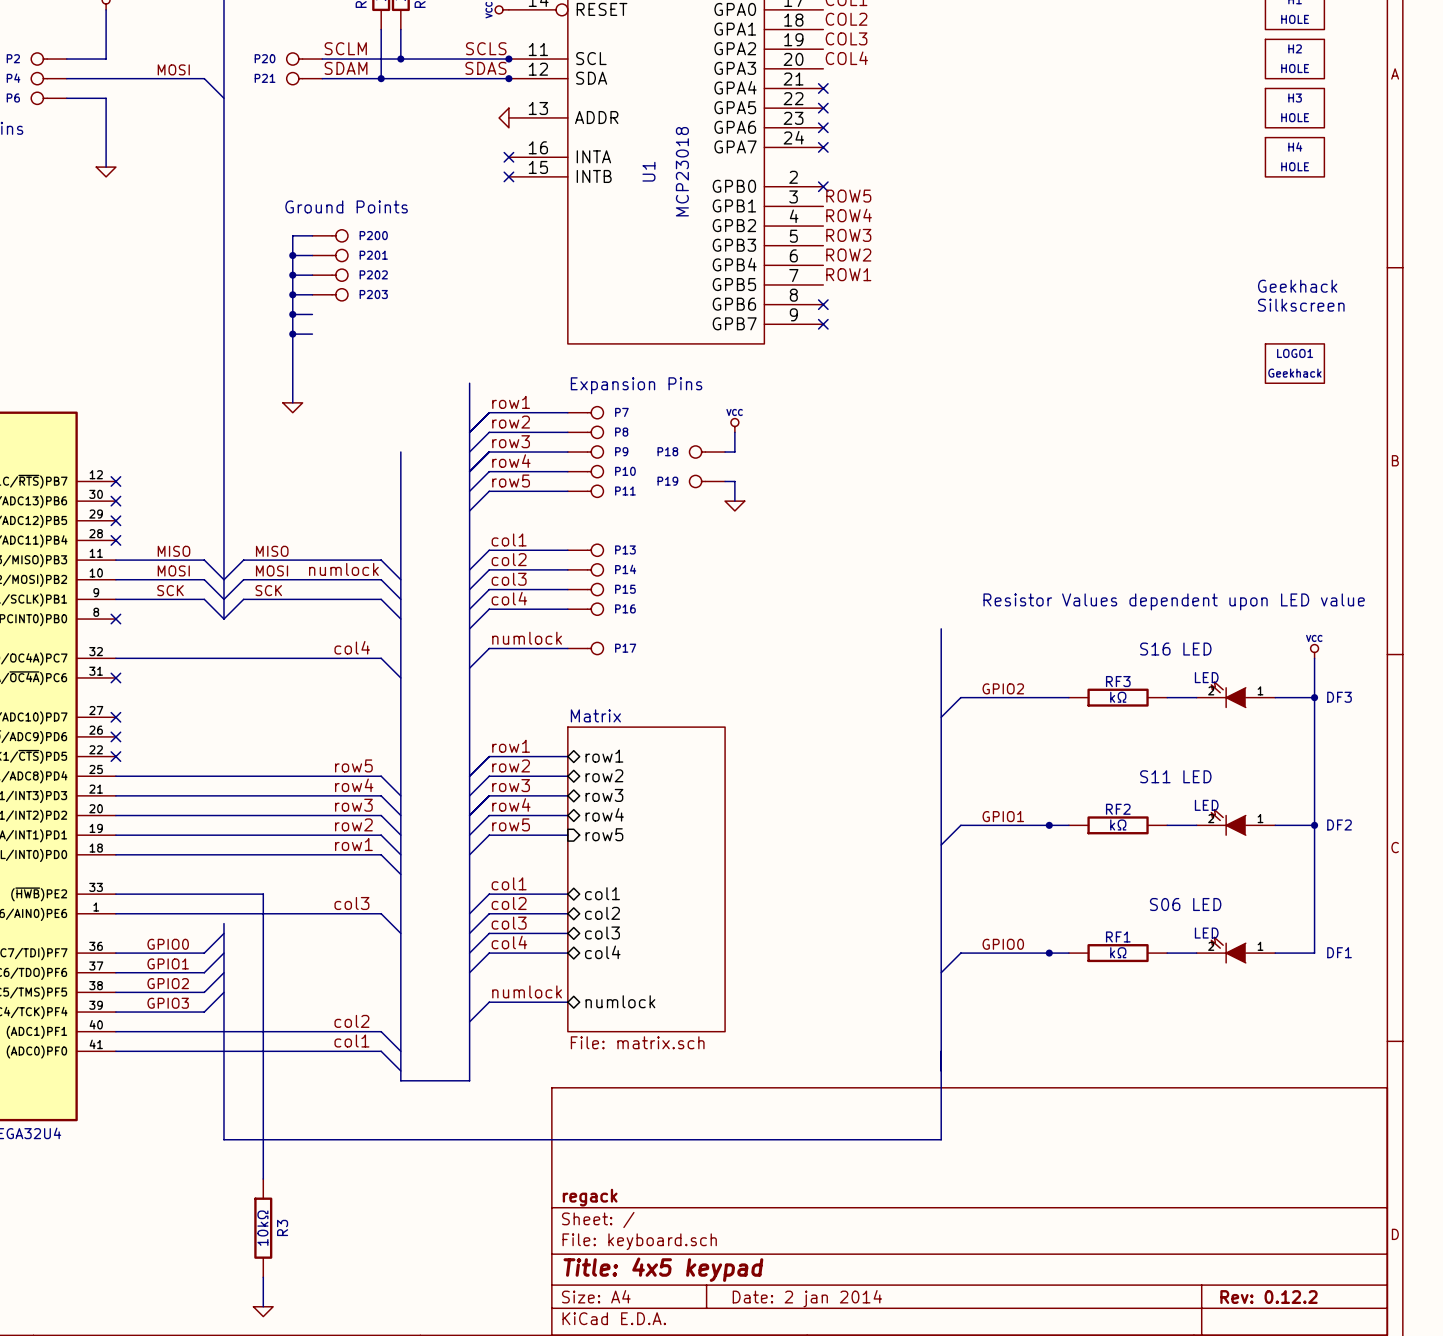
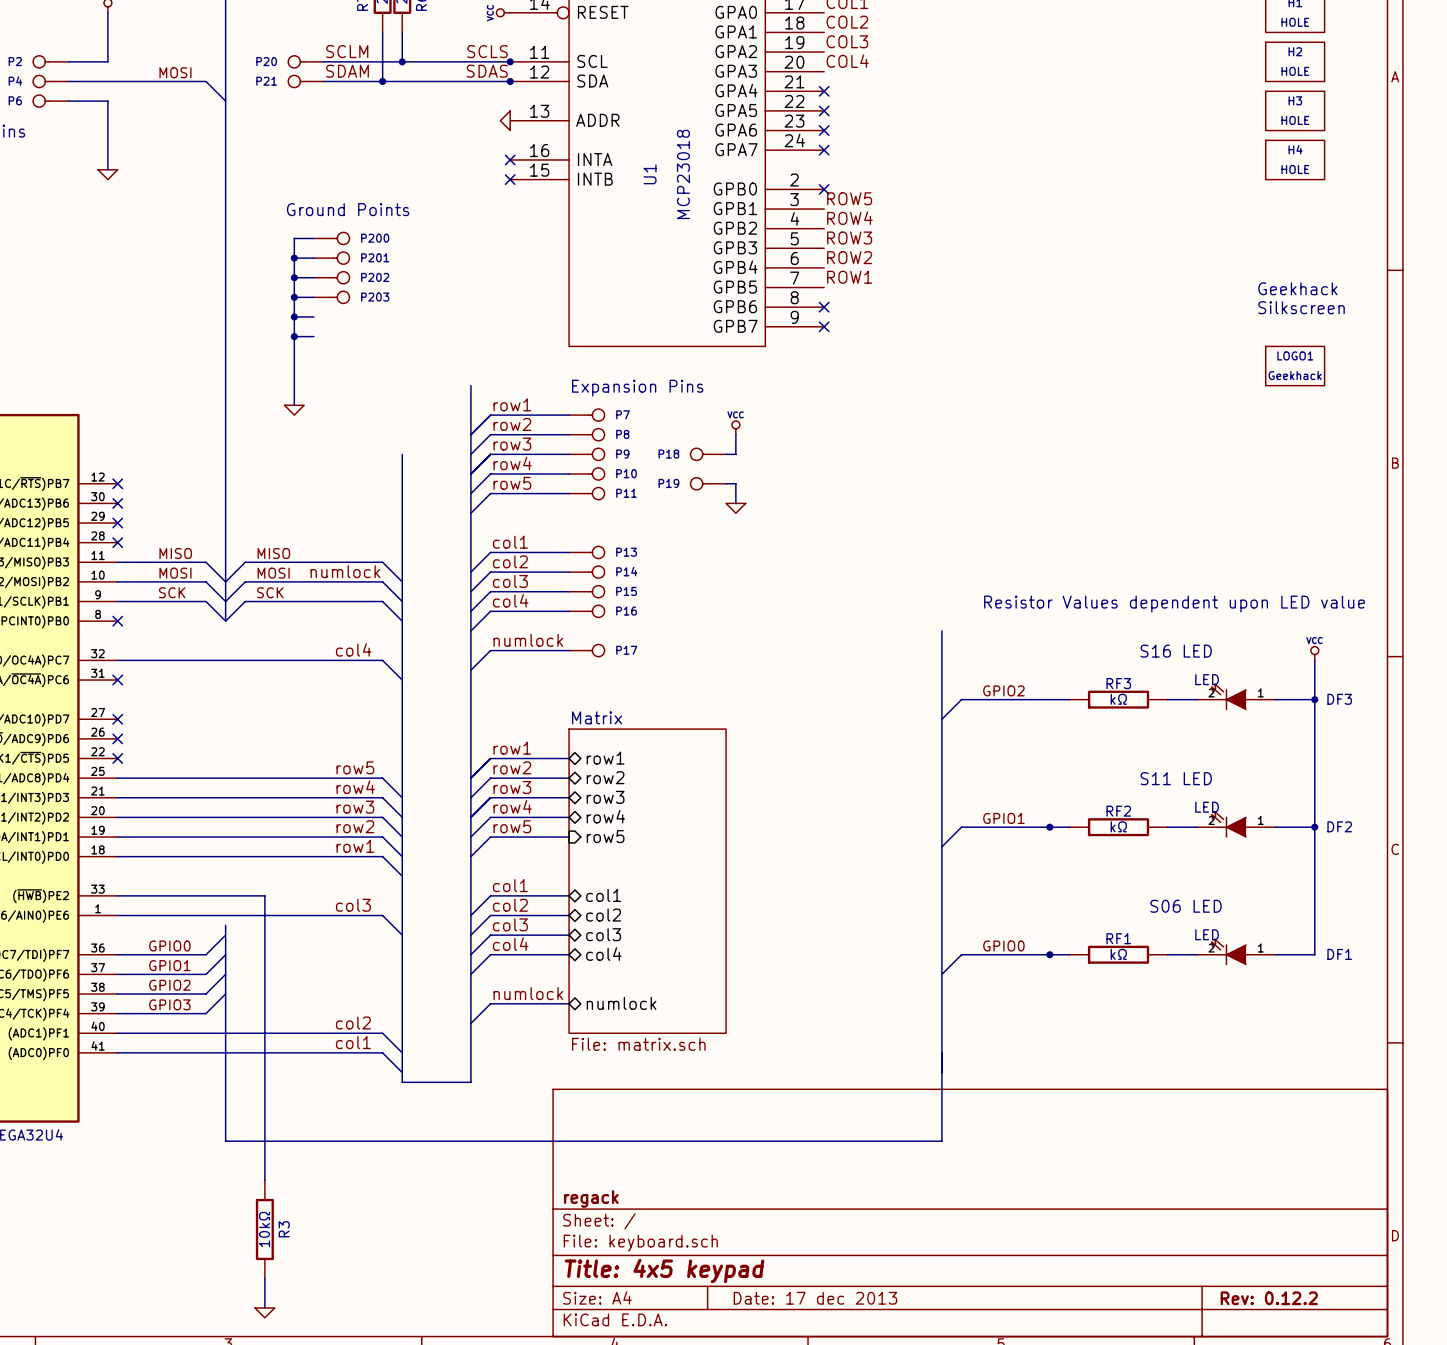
title block: Date: 2 jan 2014 (807, 1298) -> Date: 17 dec 2013 (815, 1298)

